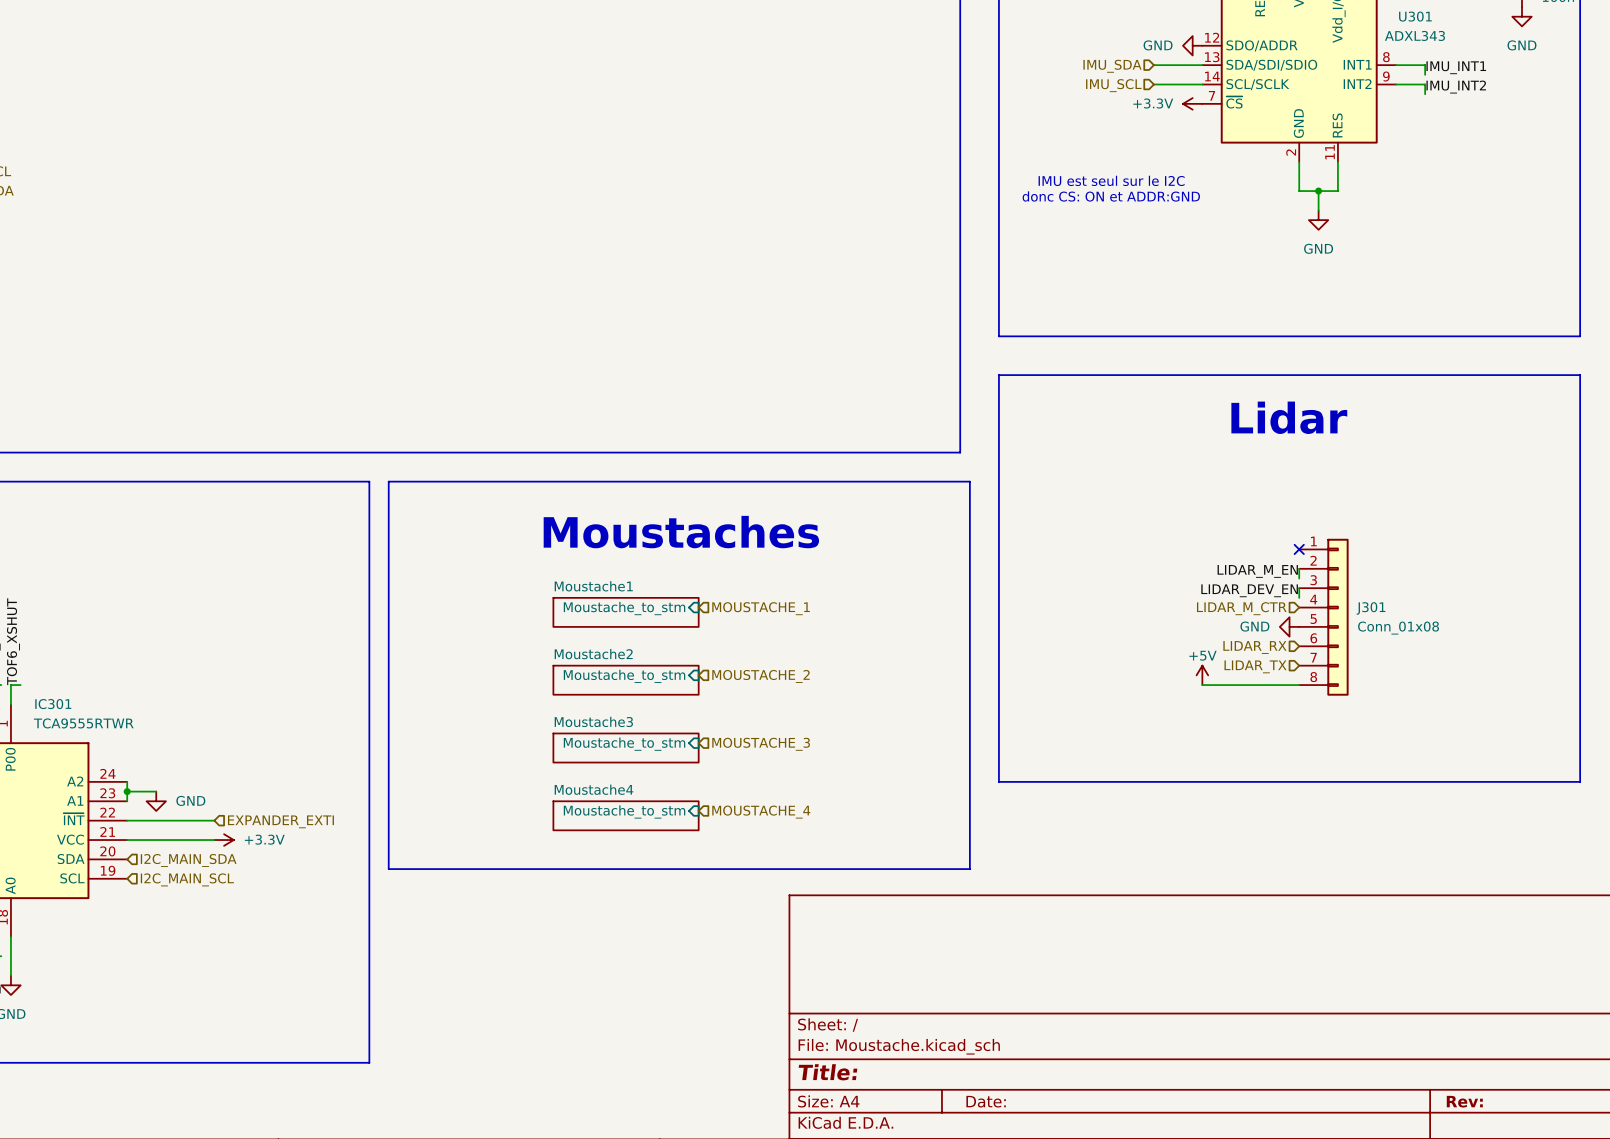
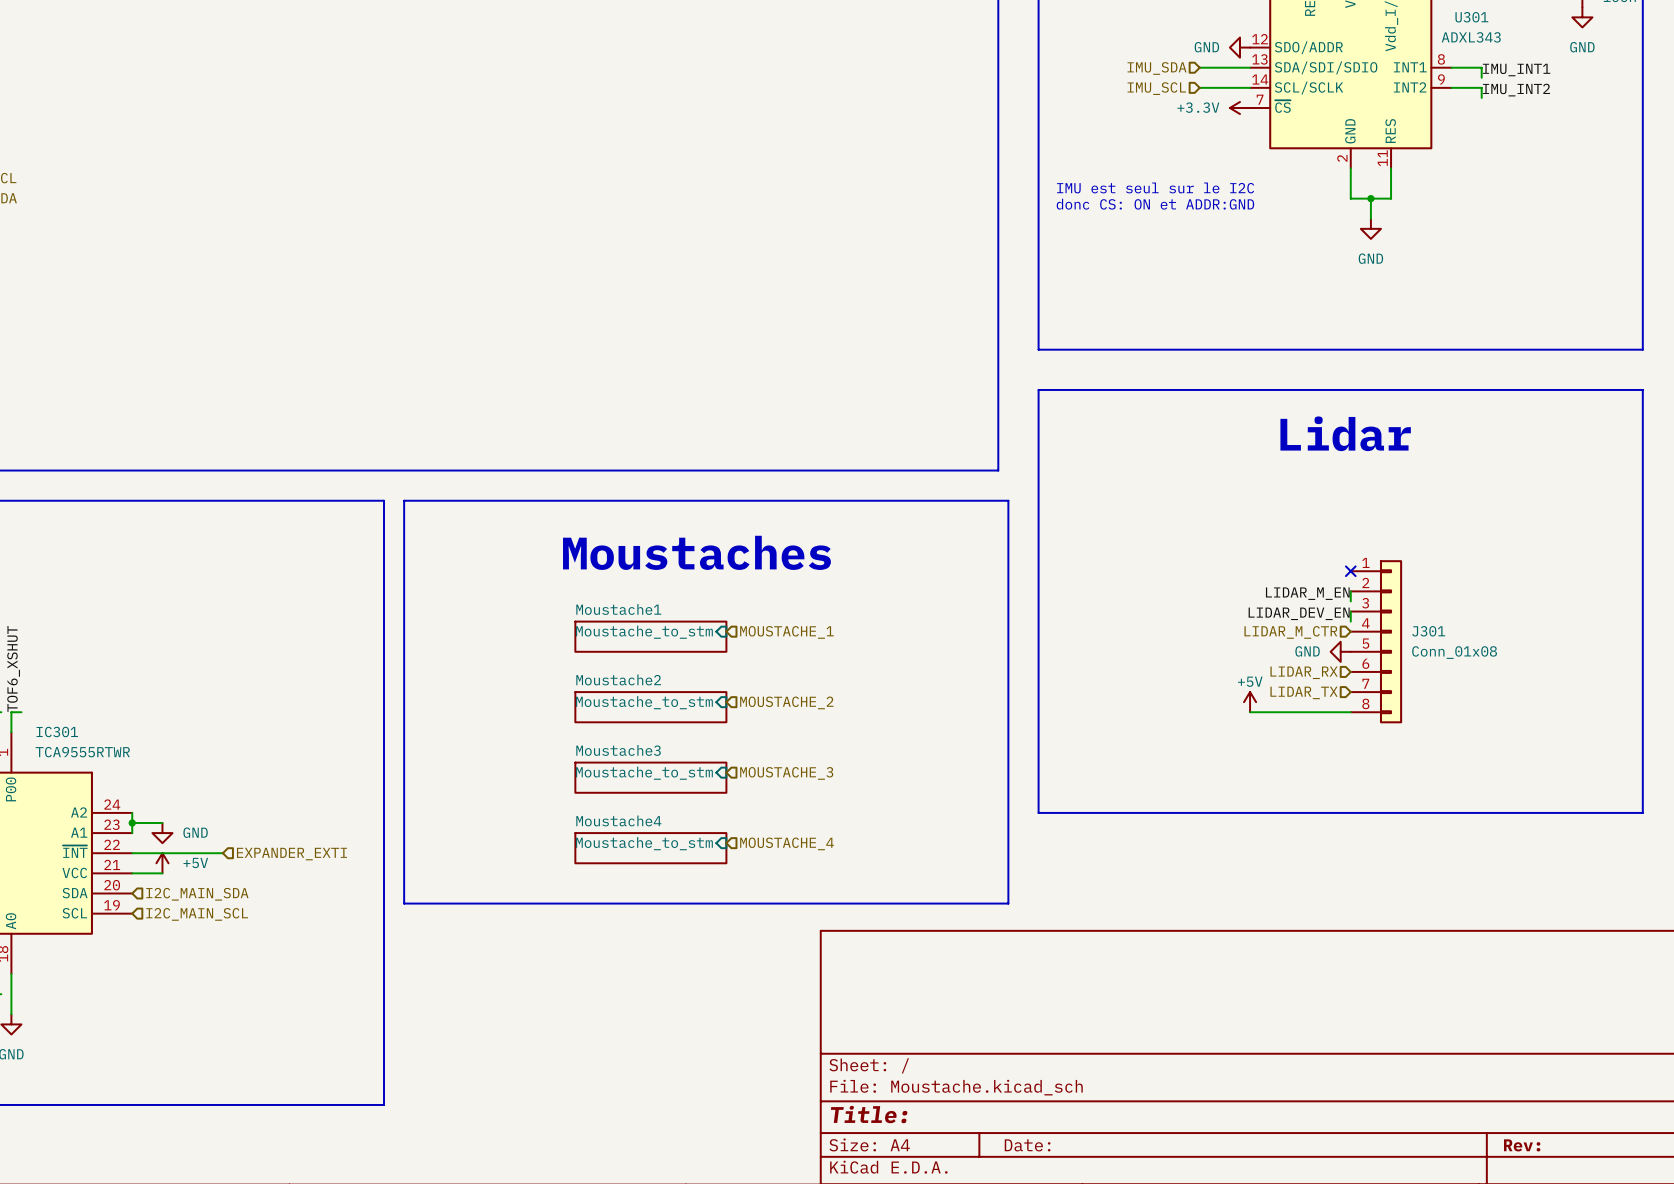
power symbol: none -> +5V (162, 863)
wire: (156, 840) (214, 840) -> none
power symbol: +3.3V (224, 840) -> none

